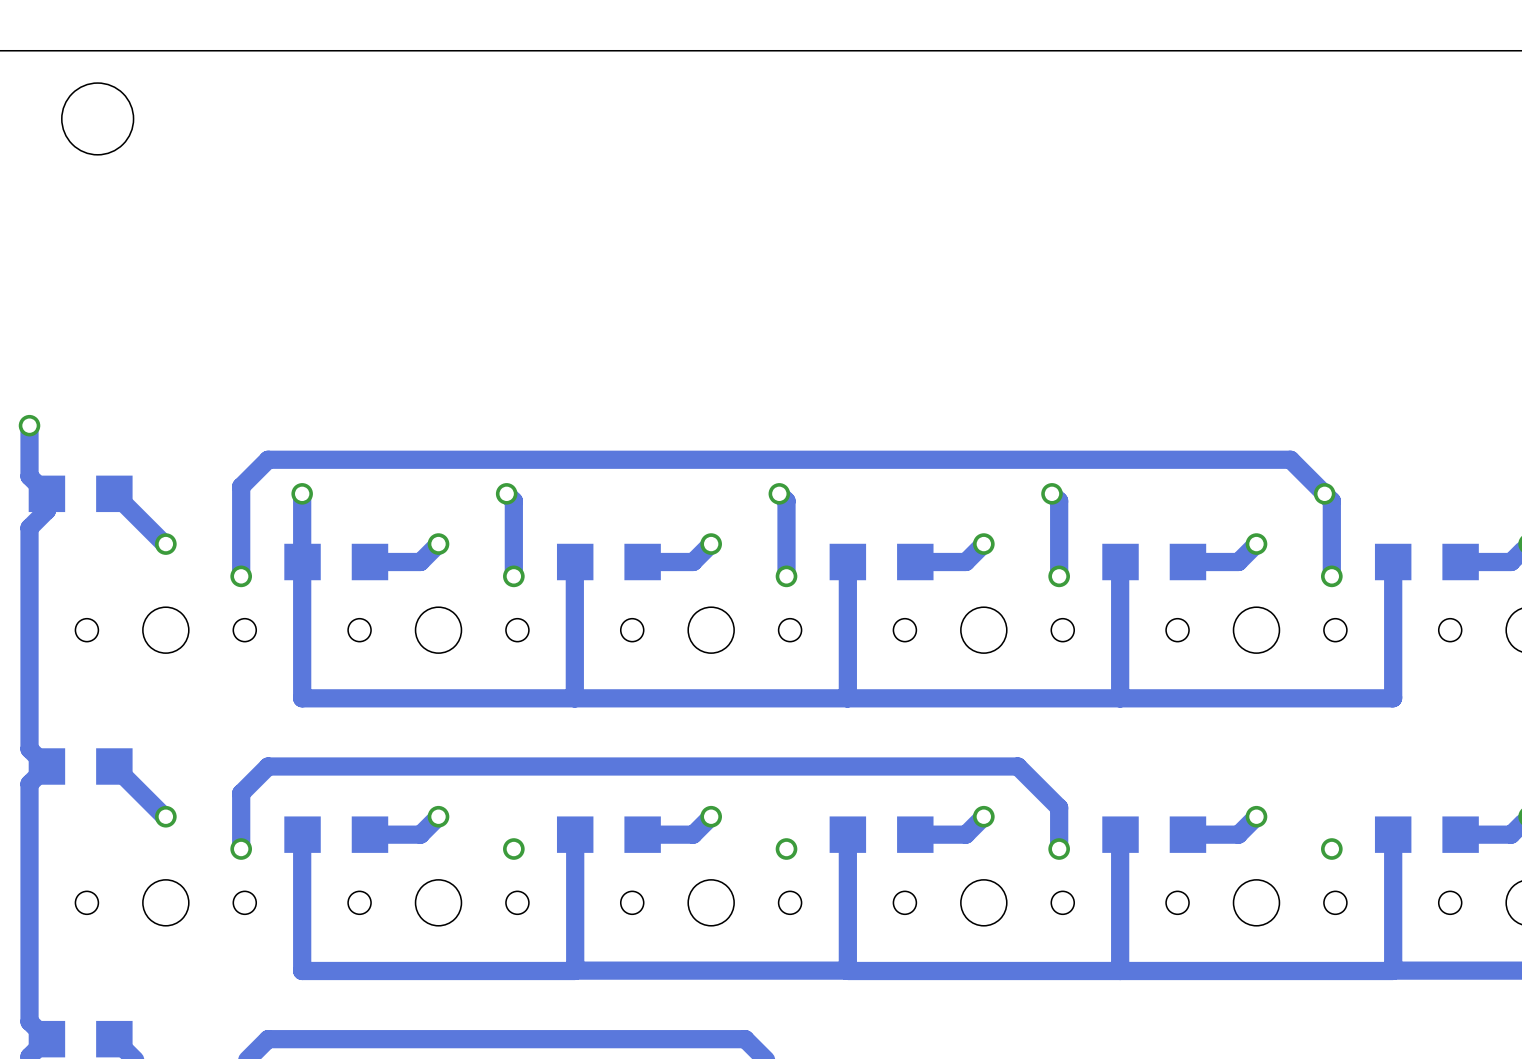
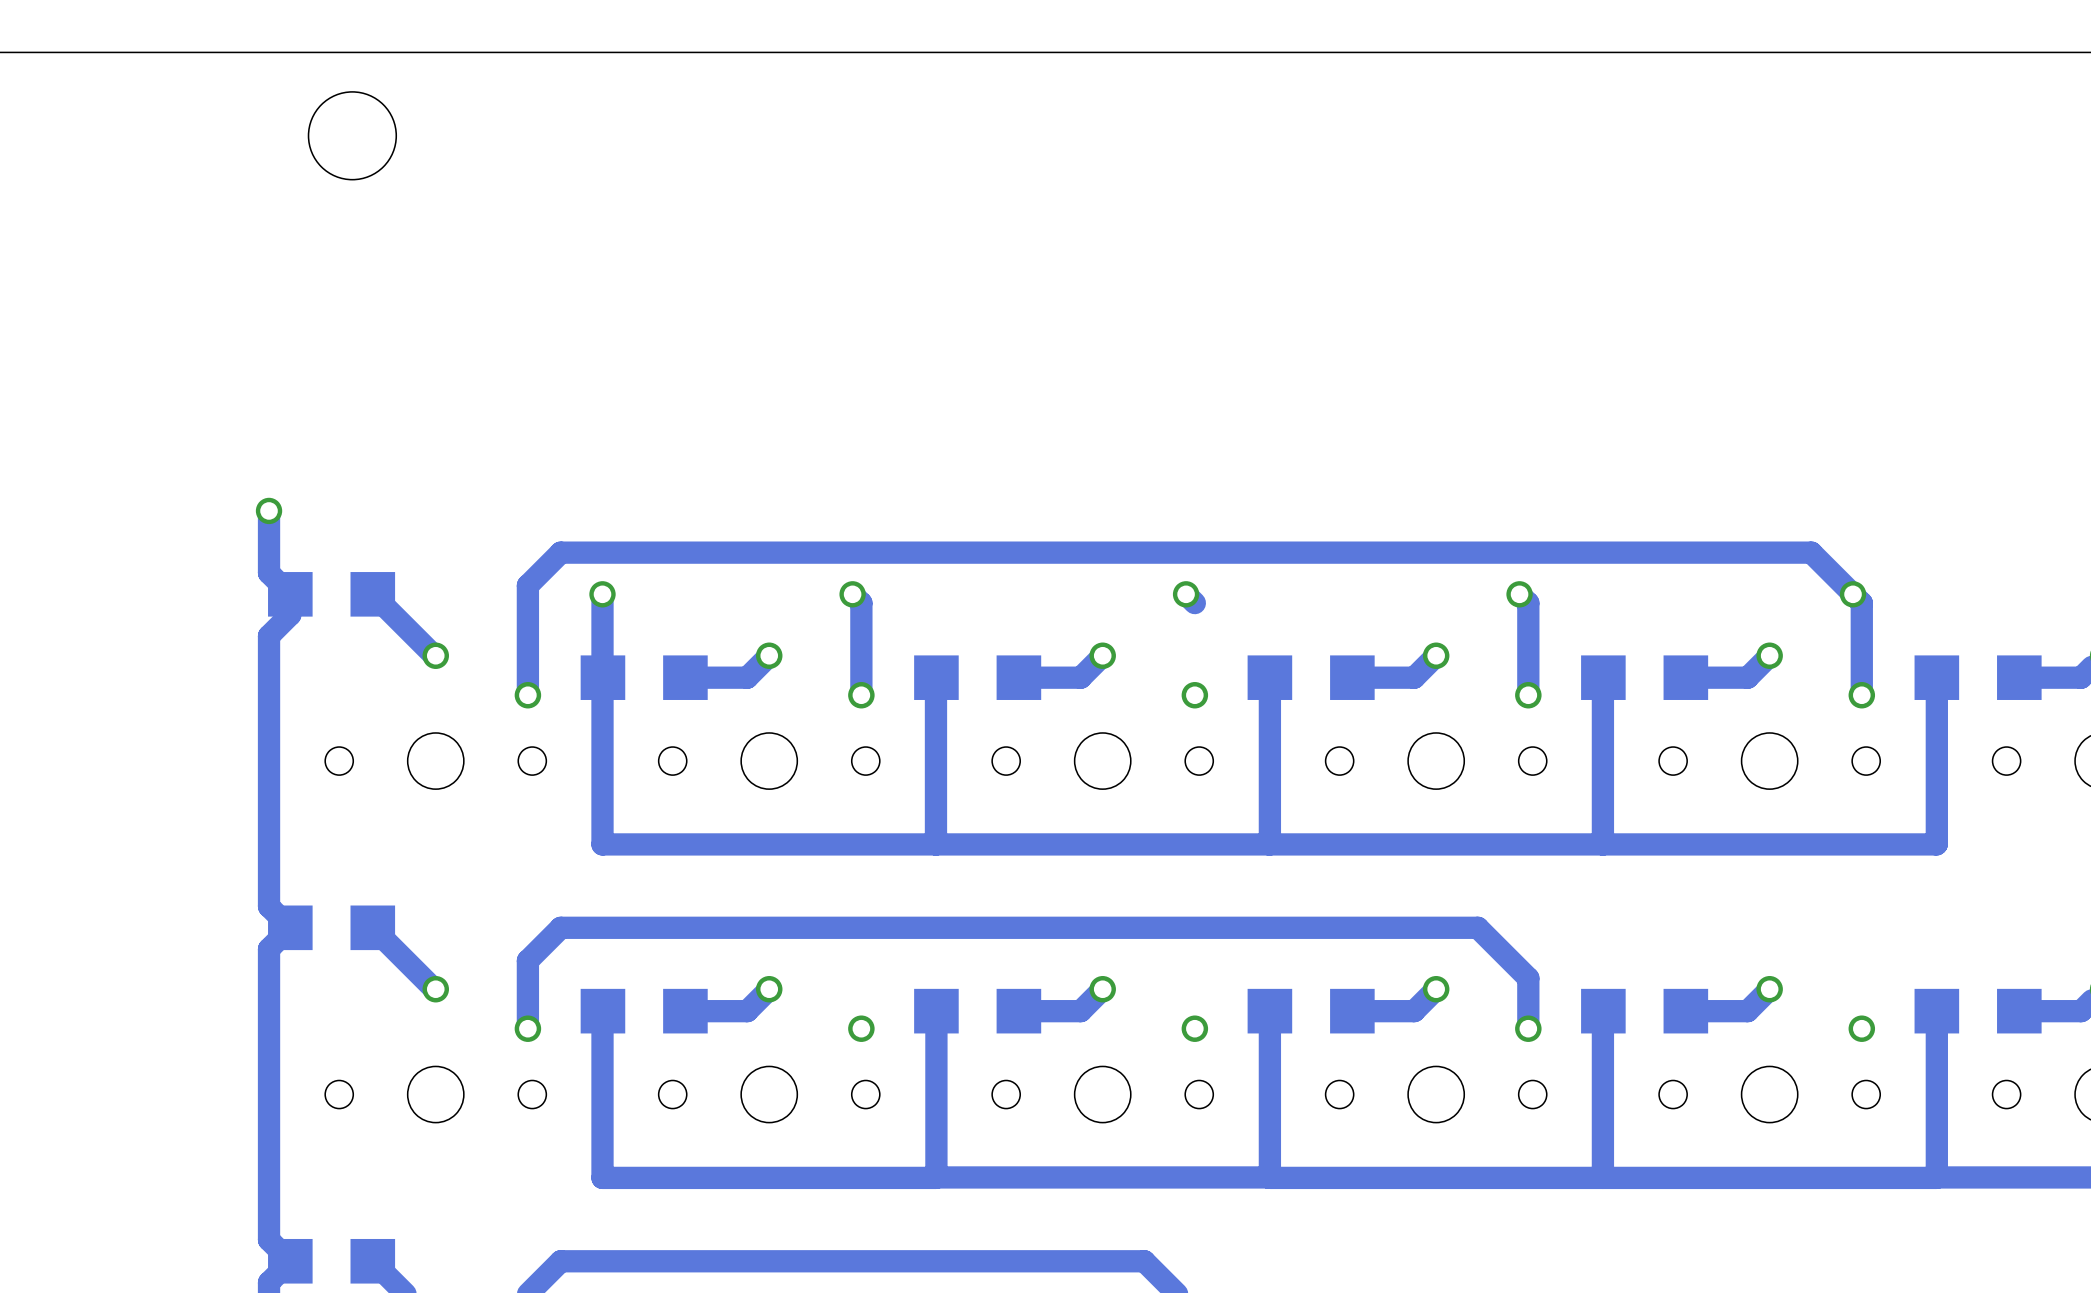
bottom track: (786, 501) (786, 576) -> none

